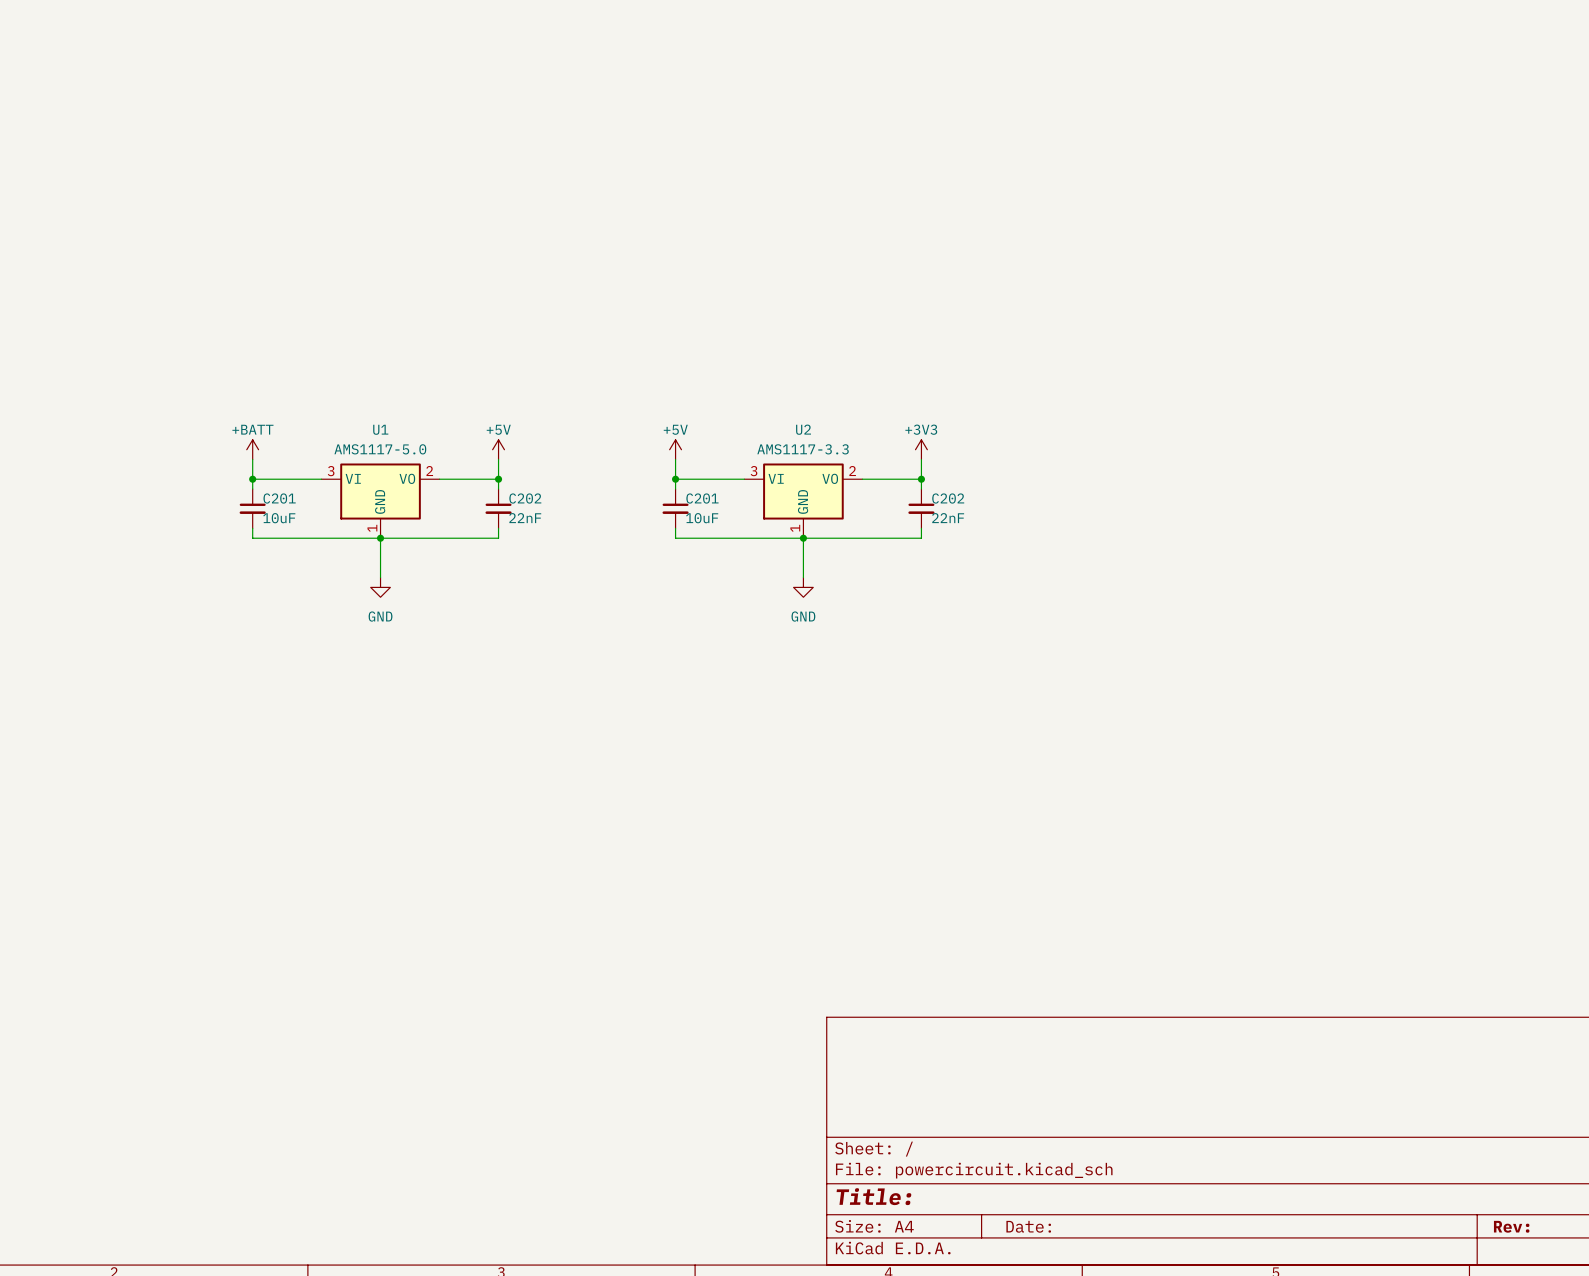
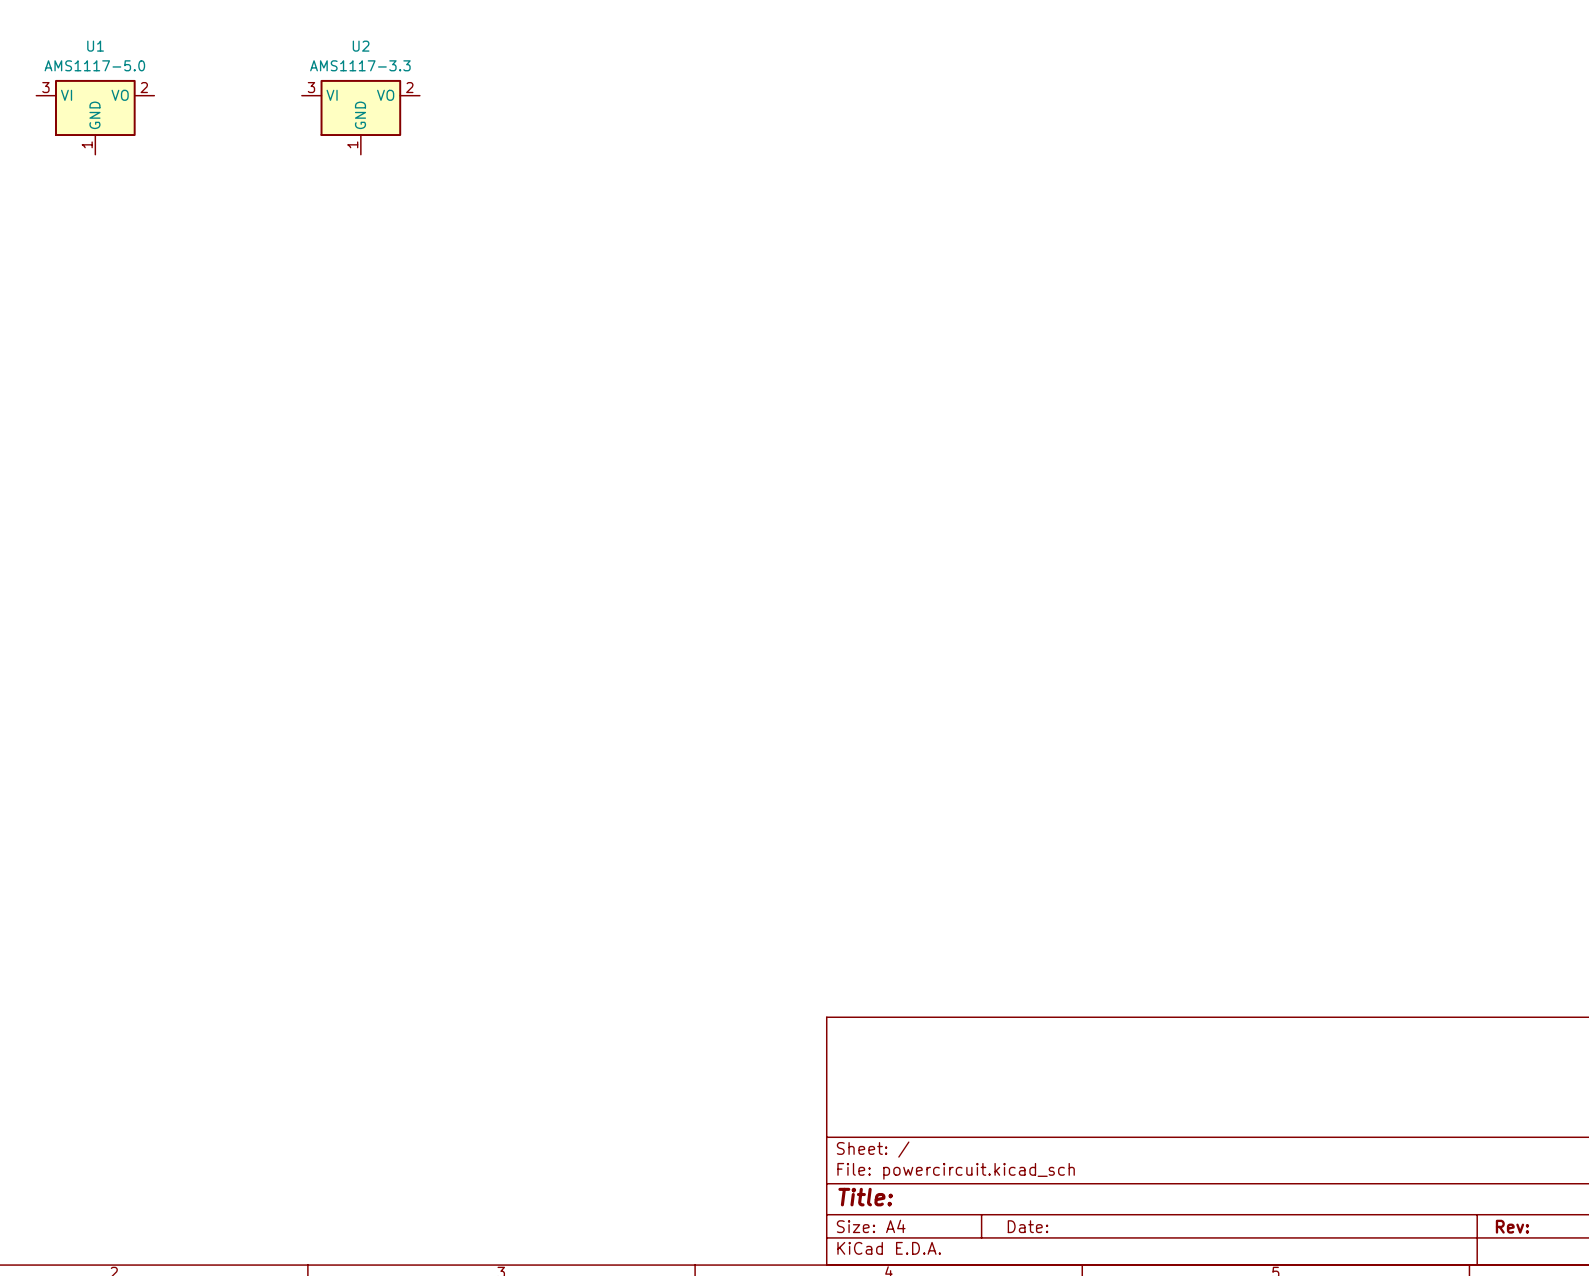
power symbol: +BATT (252, 449) -> none
power symbol: +5V (498, 449) -> none
power symbol: +5V (675, 449) -> none
power symbol: +3V3 (921, 449) -> none
wire: (252, 459) (252, 489) -> none
wire: (498, 459) (498, 489) -> none
wire: (675, 459) (675, 489) -> none
wire: (921, 459) (921, 489) -> none
wire: (252, 479) (321, 479) -> none
junction: (252, 479) -> none
wire: (439, 479) (498, 479) -> none
junction: (498, 479) -> none
wire: (675, 479) (744, 479) -> none
junction: (675, 479) -> none
wire: (862, 479) (921, 479) -> none
junction: (921, 479) -> none
U1 position: (380, 500) -> (95, 117)
U2 position: (803, 500) -> (360, 117)
C201: 10uF (252, 508) -> none
C202: 22nF (498, 508) -> none
C201: 10uF (675, 508) -> none
C202: 22nF (921, 508) -> none
wire: (252, 528) (252, 538) (498, 538) (498, 528) -> none
wire: (675, 528) (675, 538) (921, 538) (921, 528) -> none
wire: (380, 538) (380, 577) -> none
junction: (380, 538) -> none
wire: (803, 538) (803, 577) -> none
junction: (803, 538) -> none
power symbol: GND (380, 587) -> none
power symbol: GND (803, 587) -> none

